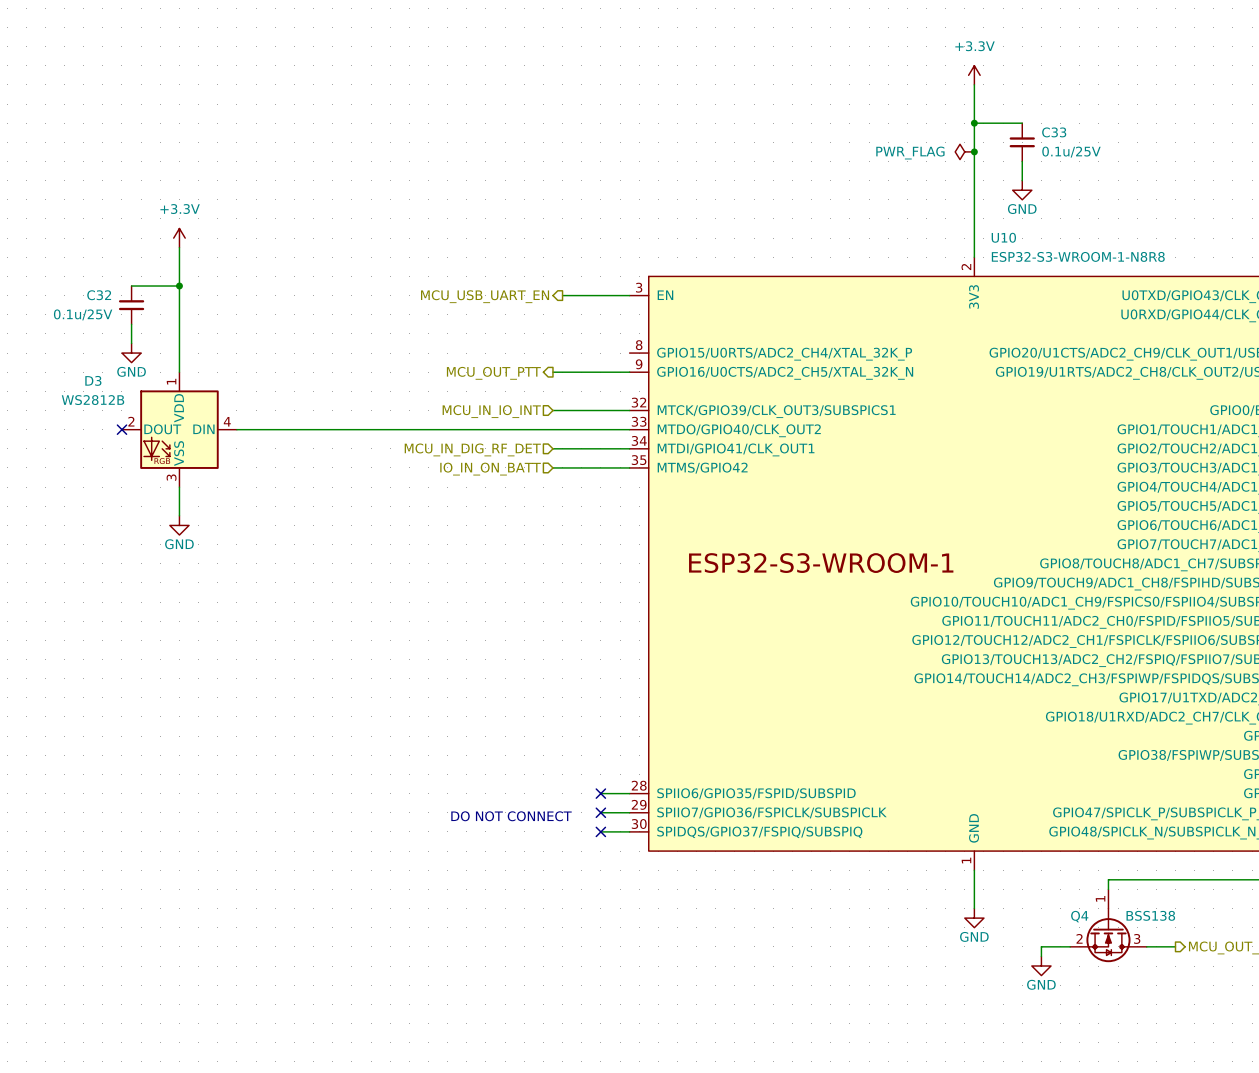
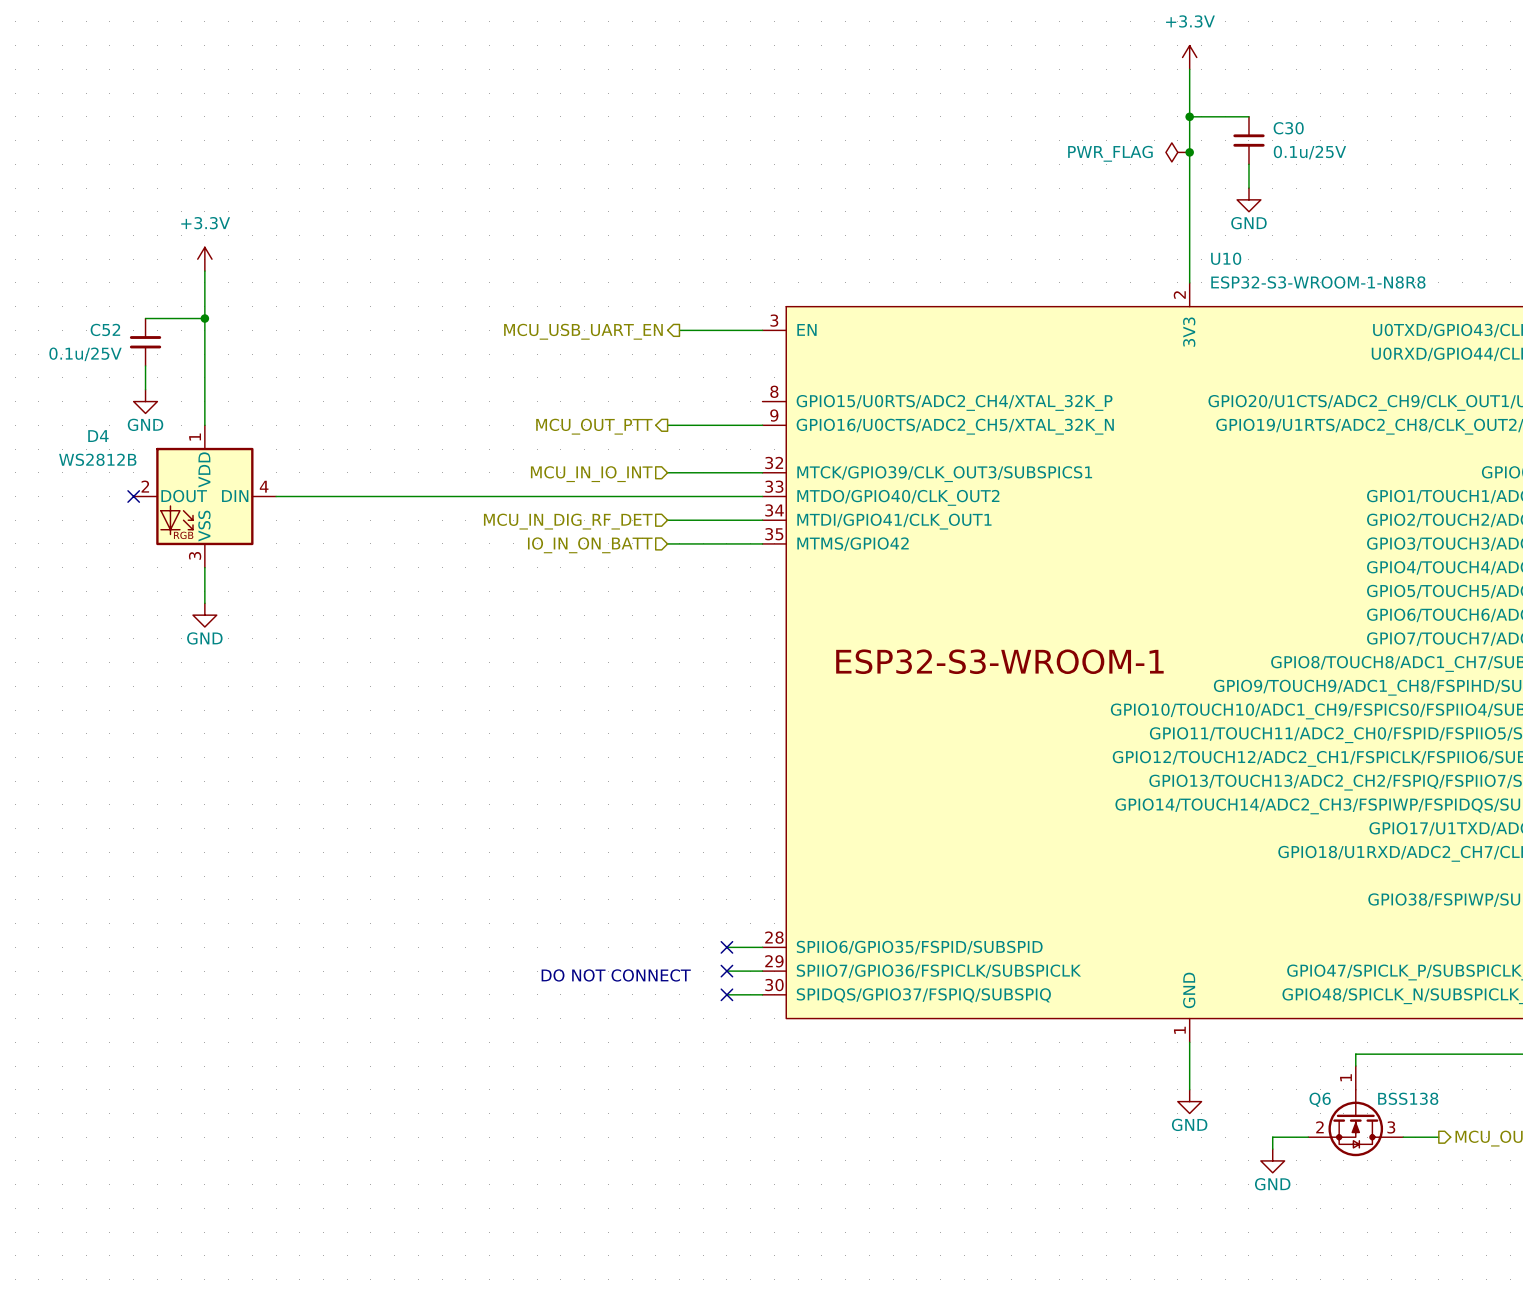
C33 name: C33 (1054, 132) -> C30 (1288, 128)
C32 name: C32 (99, 295) -> C52 (105, 329)
D3 name: D3 (93, 380) -> D4 (98, 436)
Q4 name: Q4 (1079, 916) -> Q6 (1320, 1099)

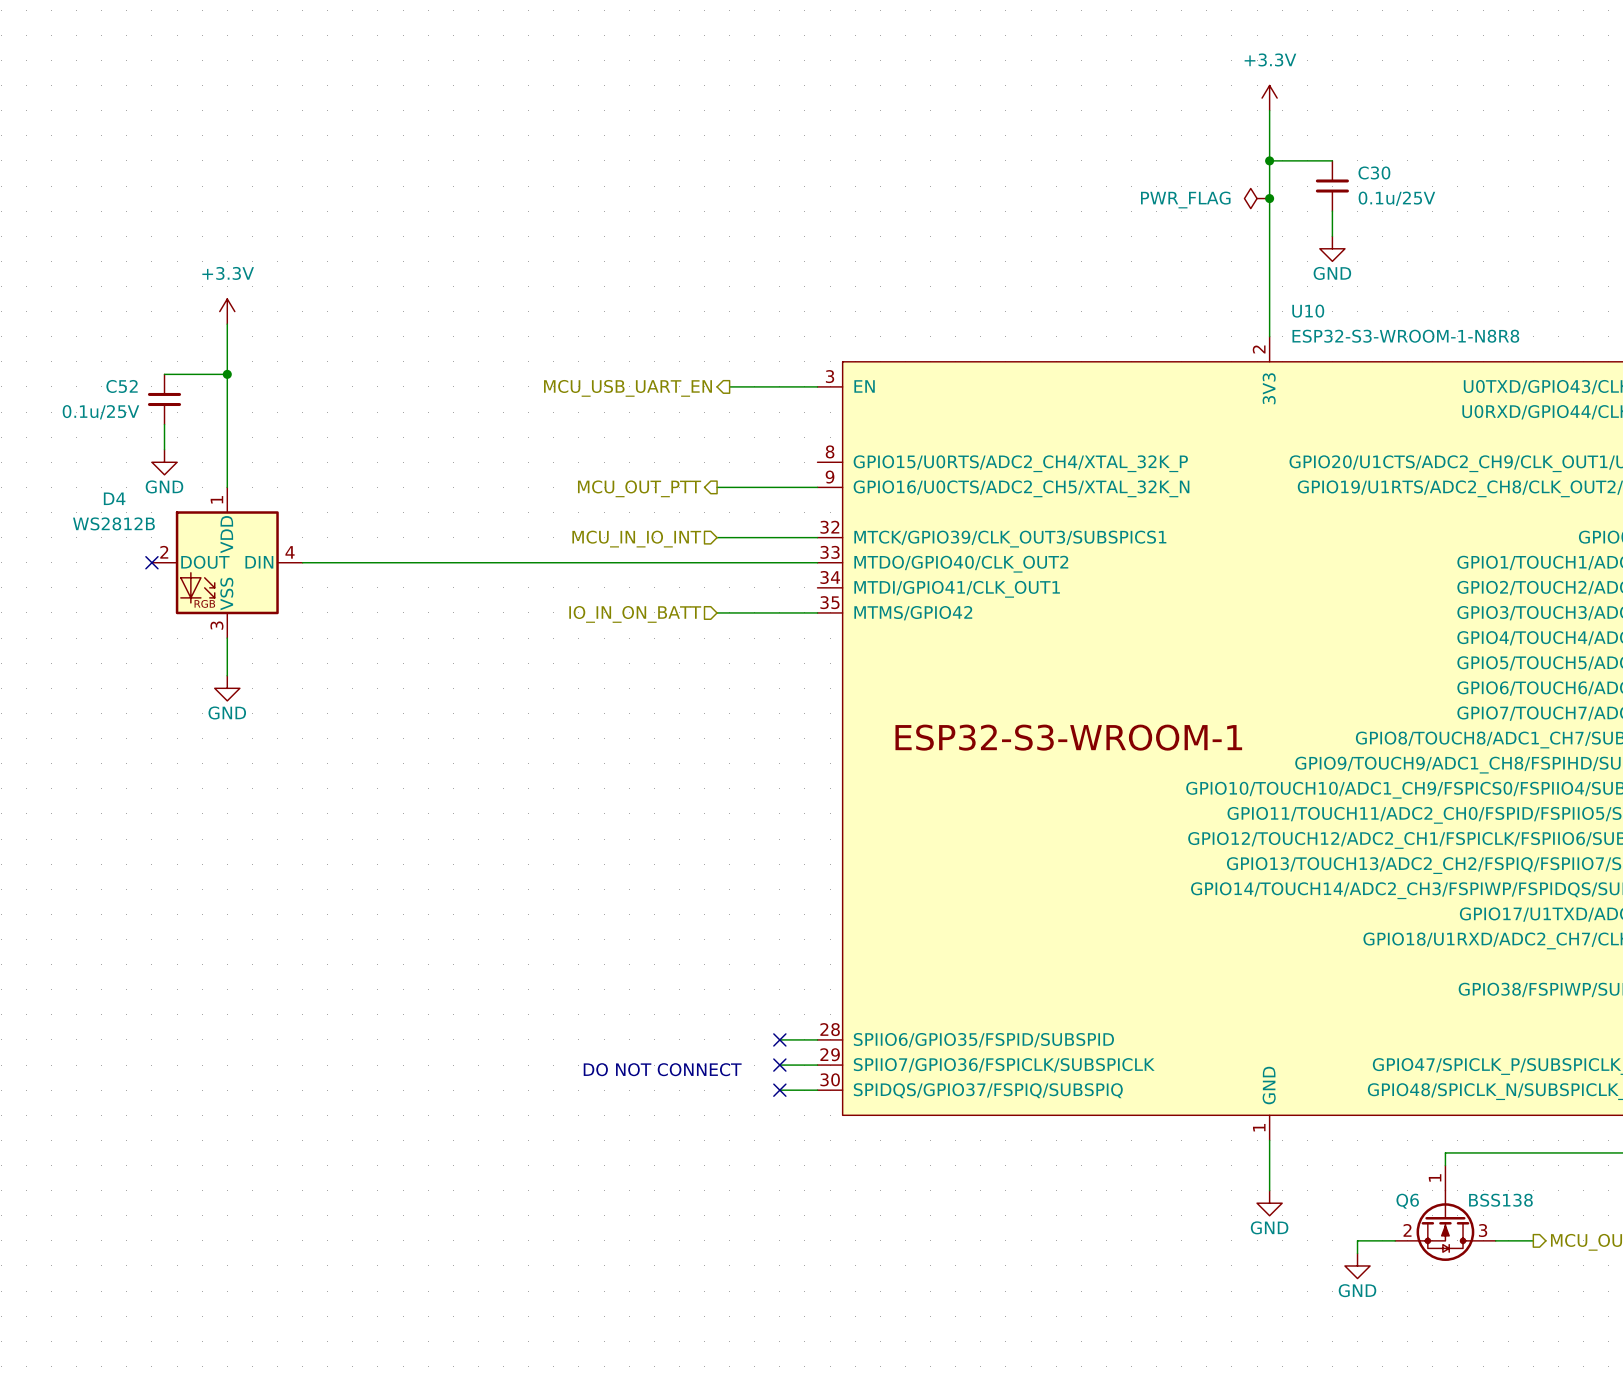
wire: (667, 520) (762, 520) -> none
hierarchical label: MCU_IN_DIG_RF_DET (568, 521) -> none

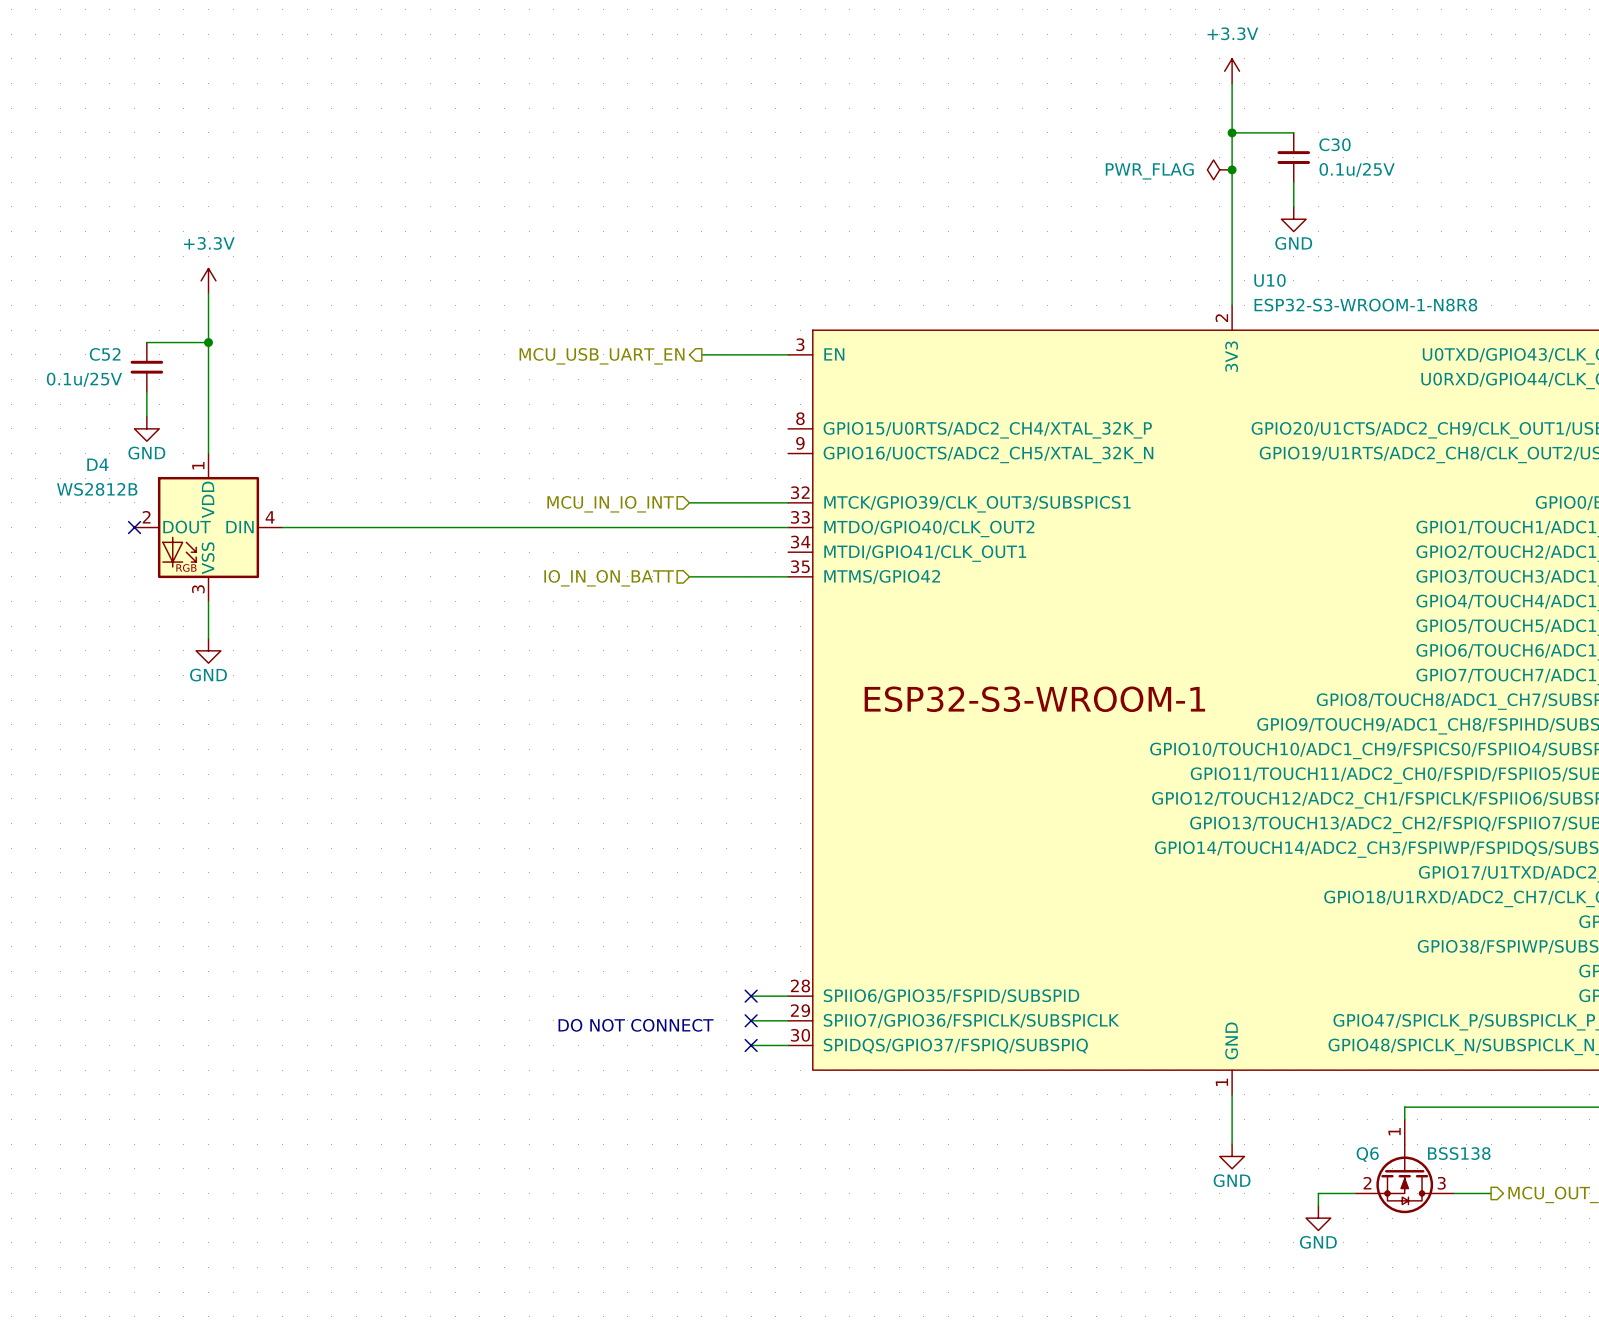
wire: (717, 487) (817, 487) -> none
hierarchical label: MCU_OUT_PTT (639, 488) -> none

